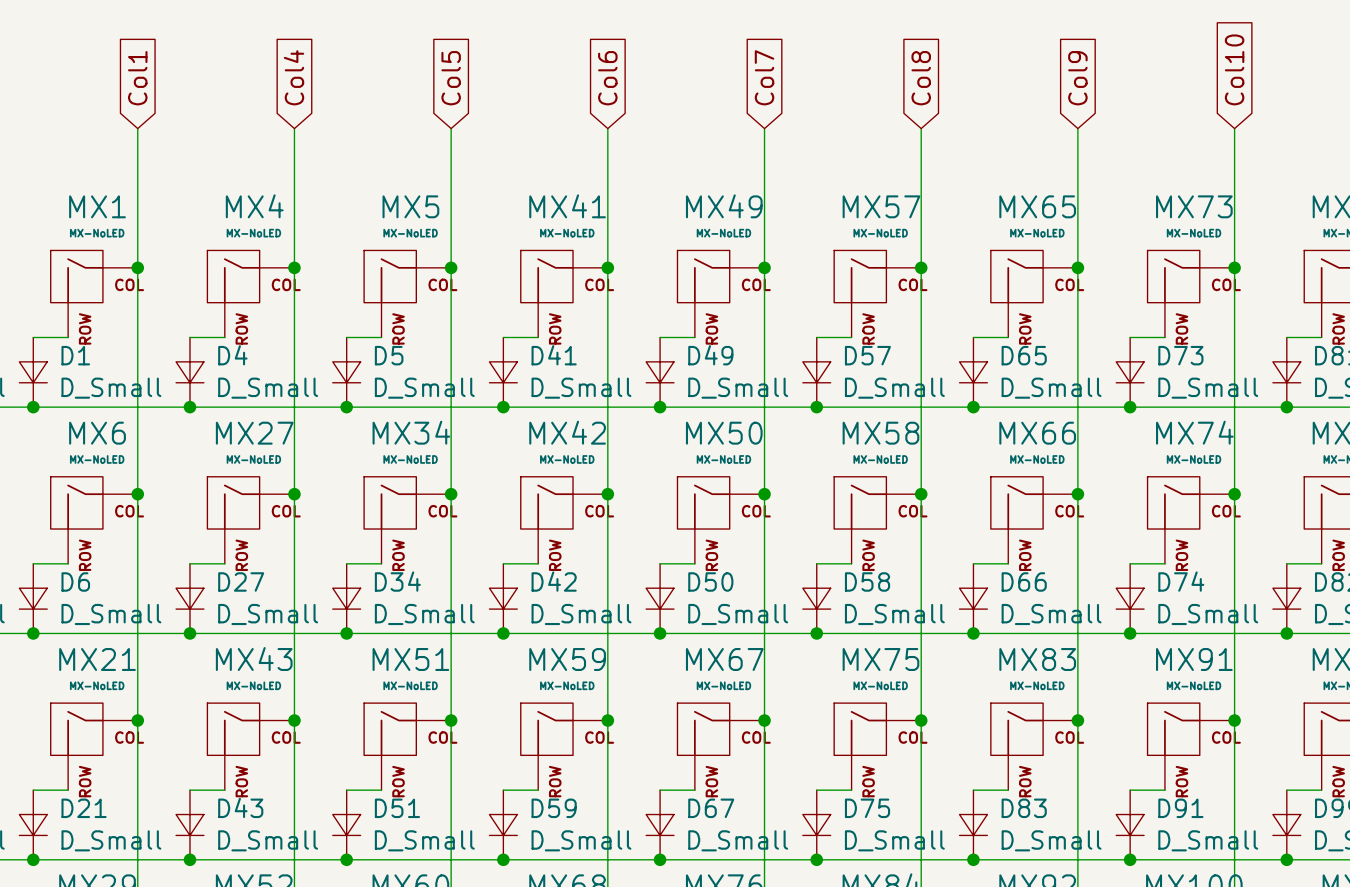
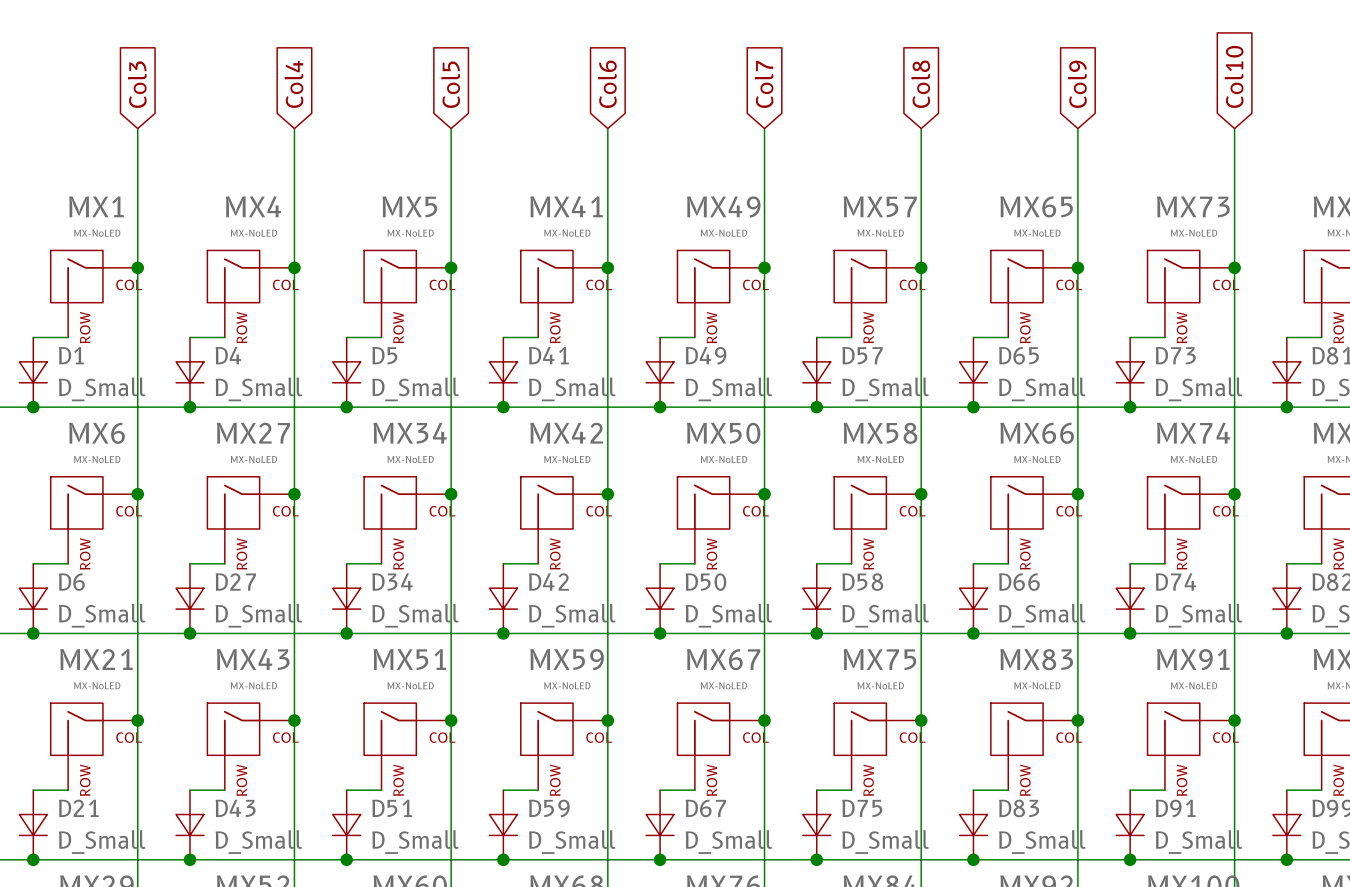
global label: Col1 (137, 78) -> Col3 (137, 84)

